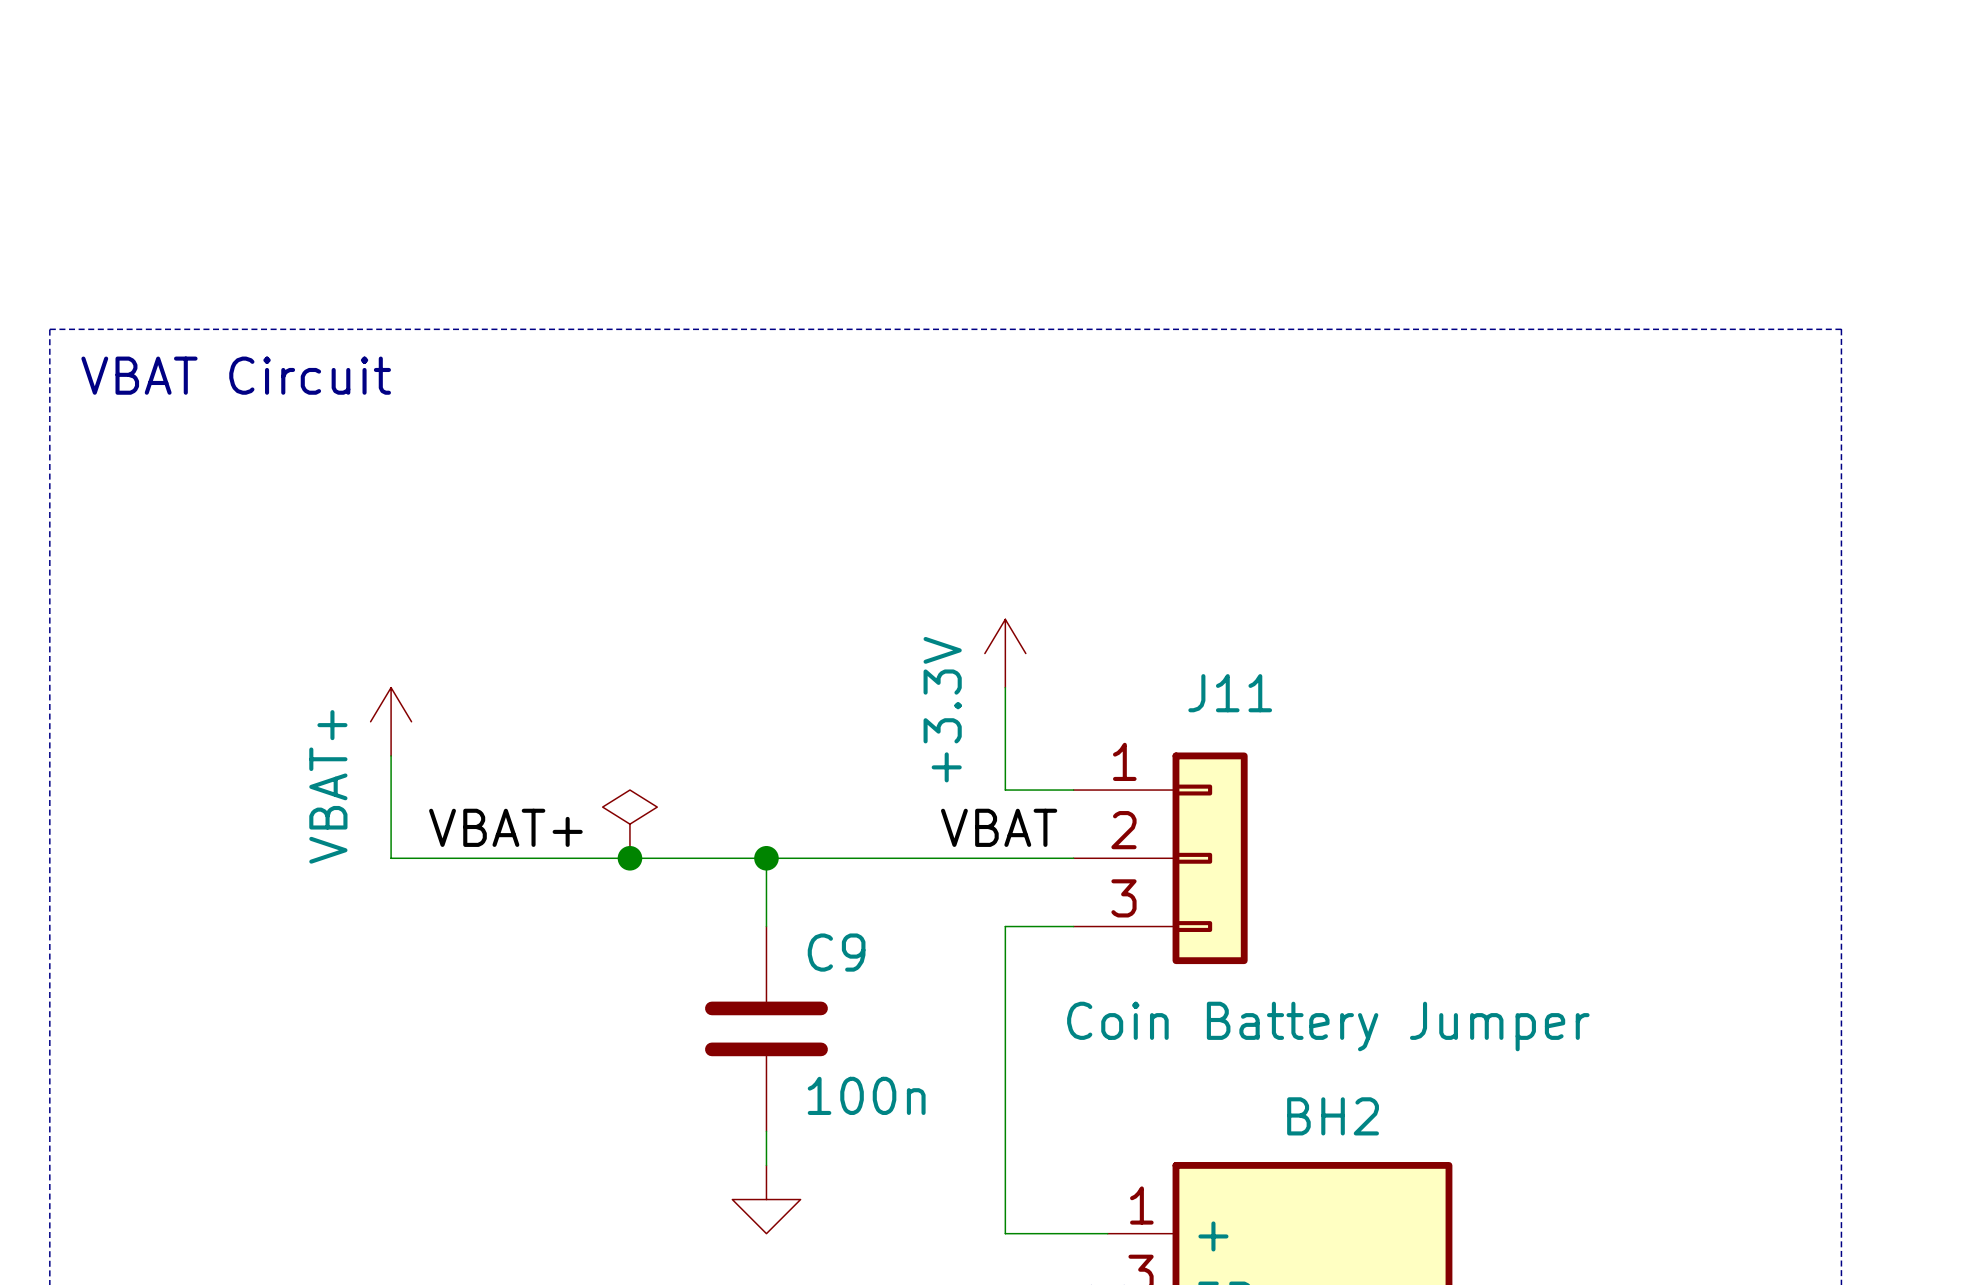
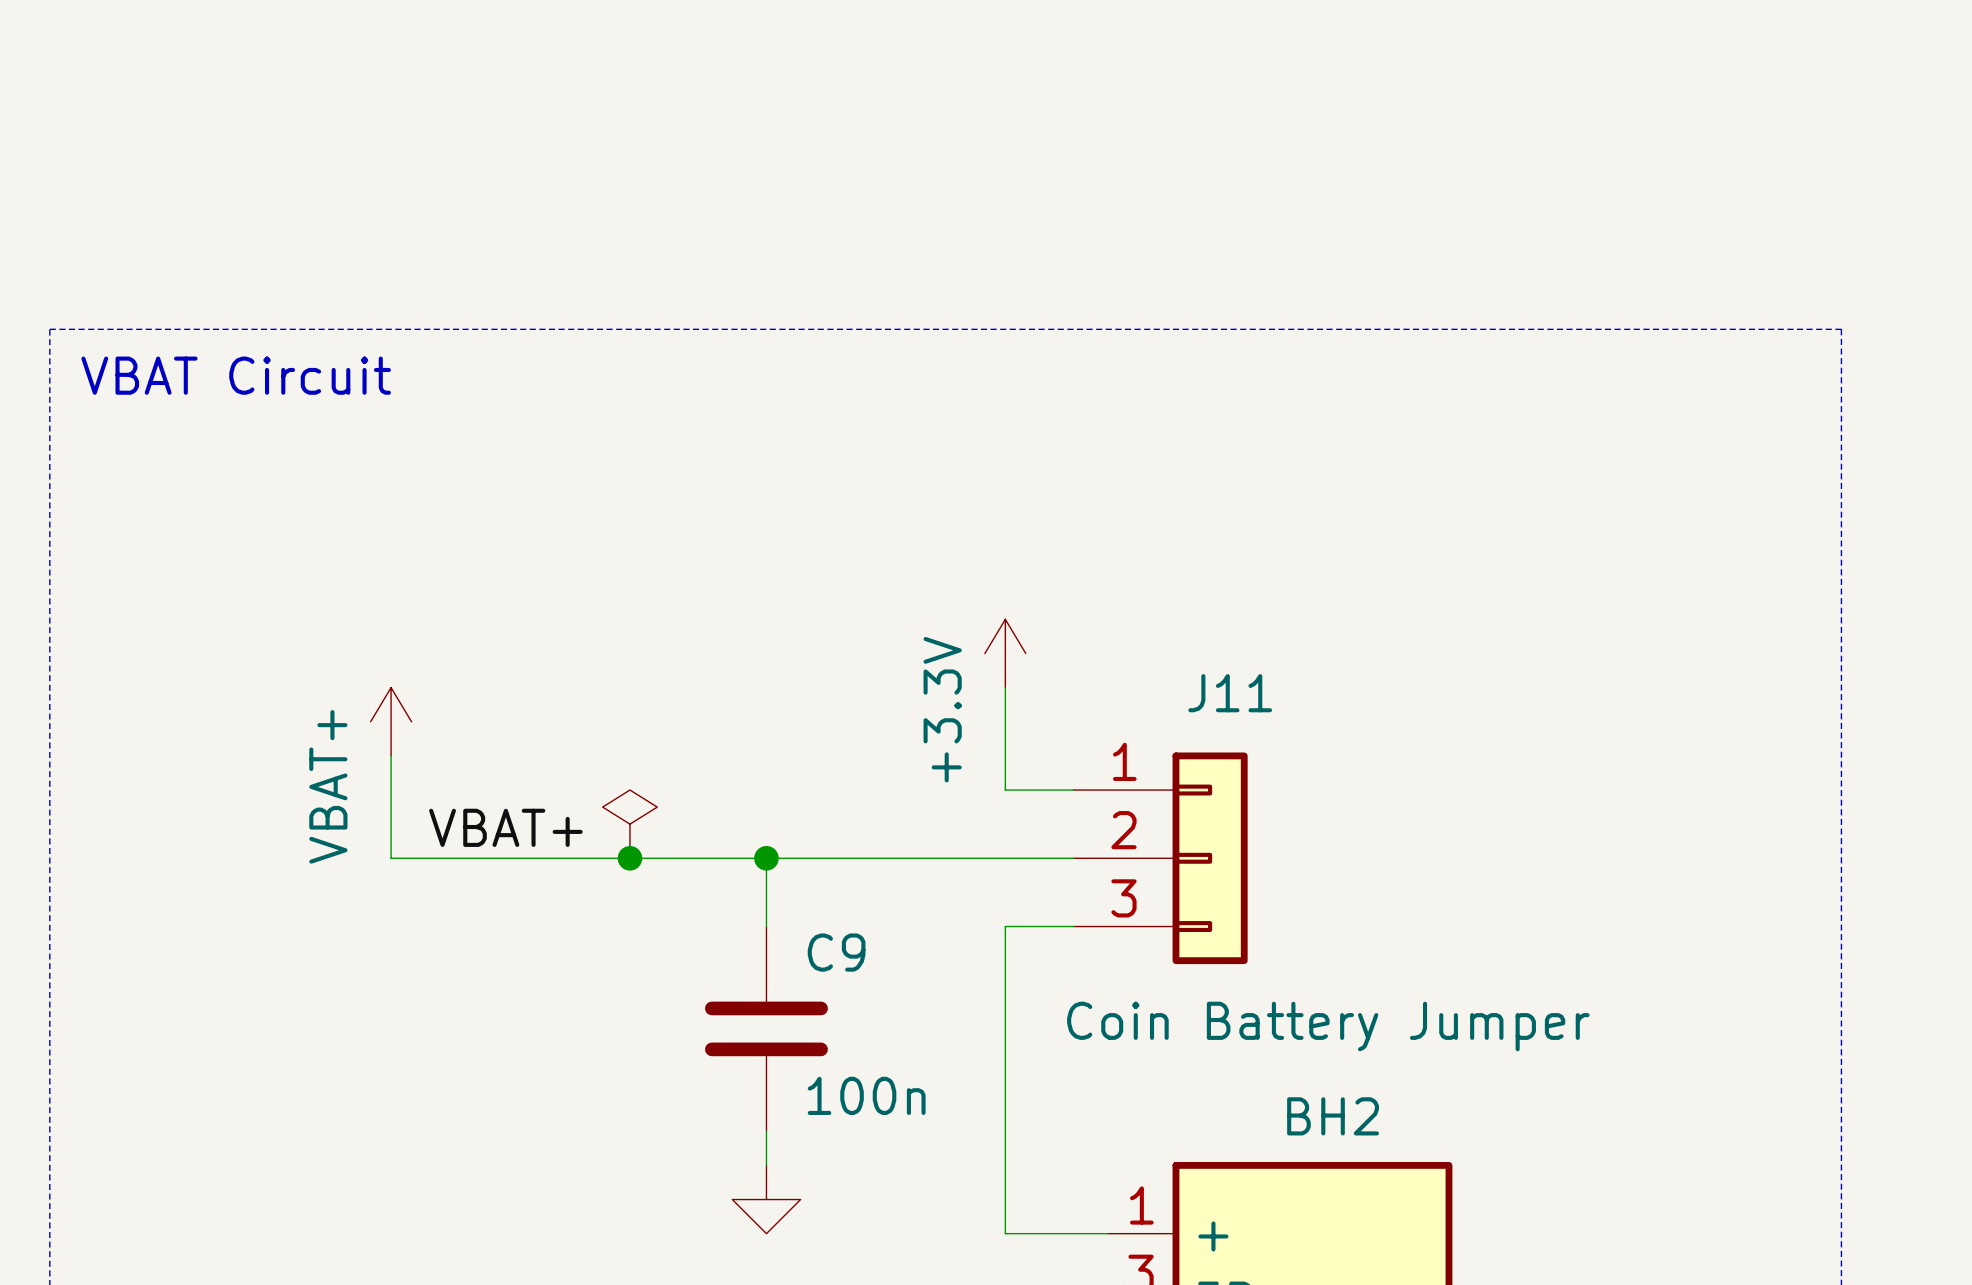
label: VBAT (999, 827) -> none

